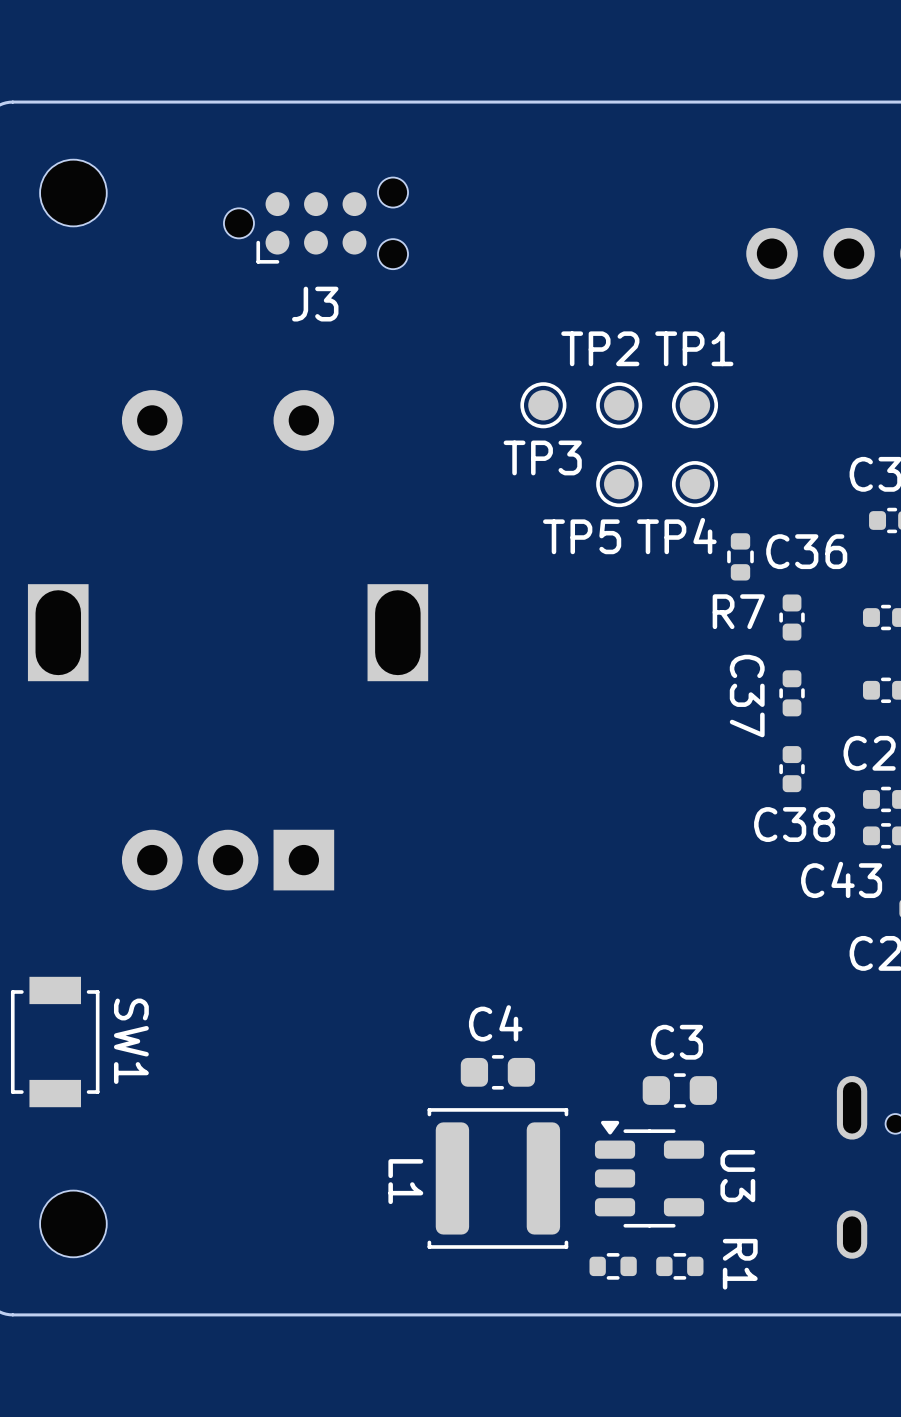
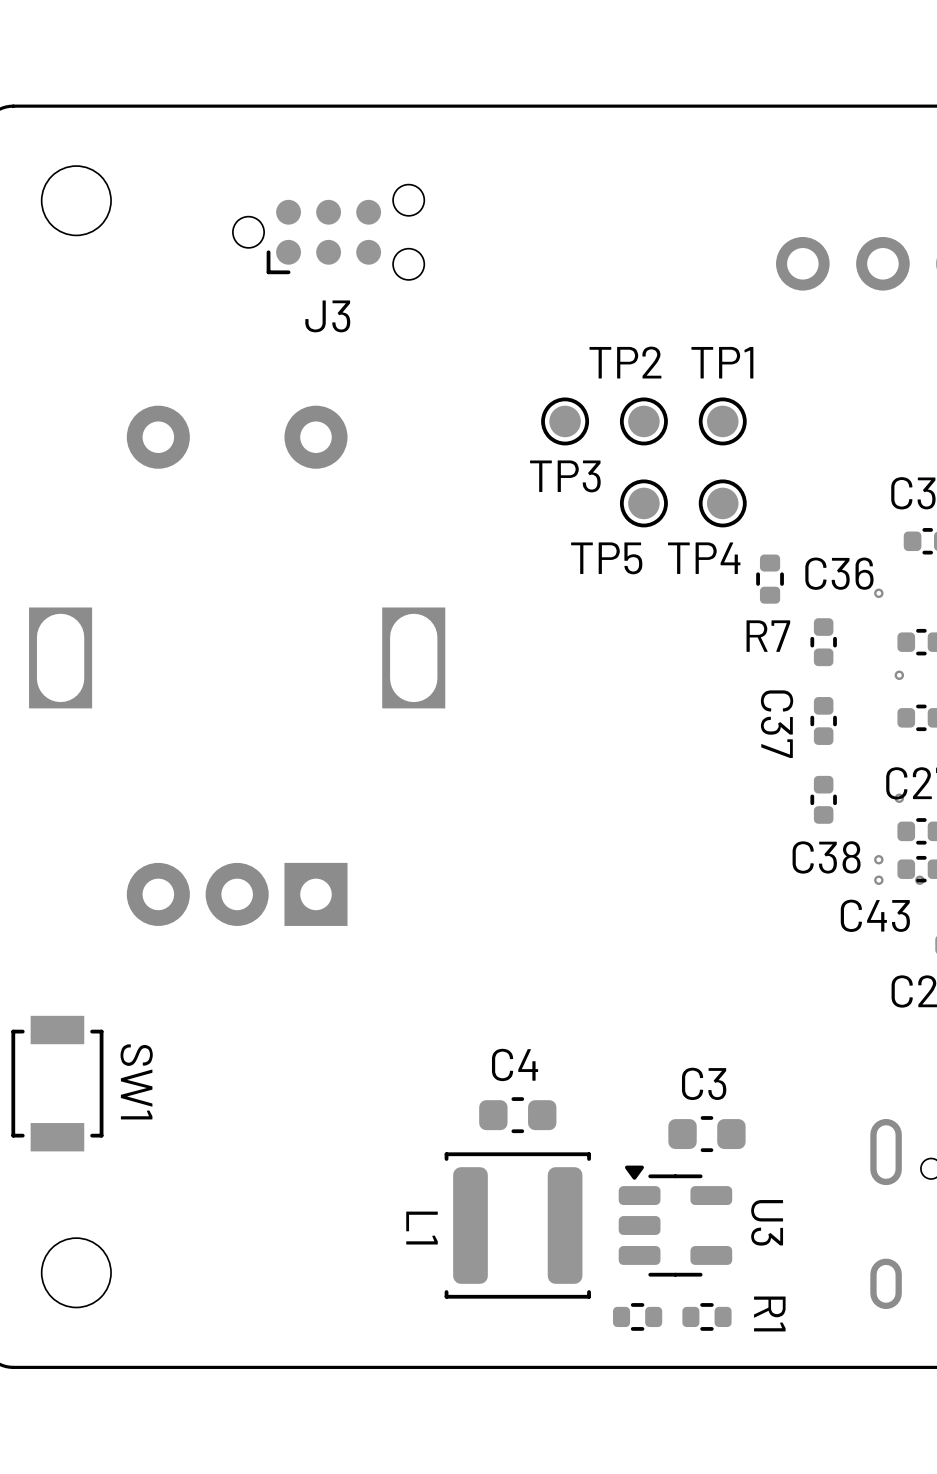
via: none -> (878, 593)
via: none -> (899, 675)
via: none -> (899, 798)
via: none -> (878, 859)
via: none -> (878, 880)
via: none -> (919, 880)

